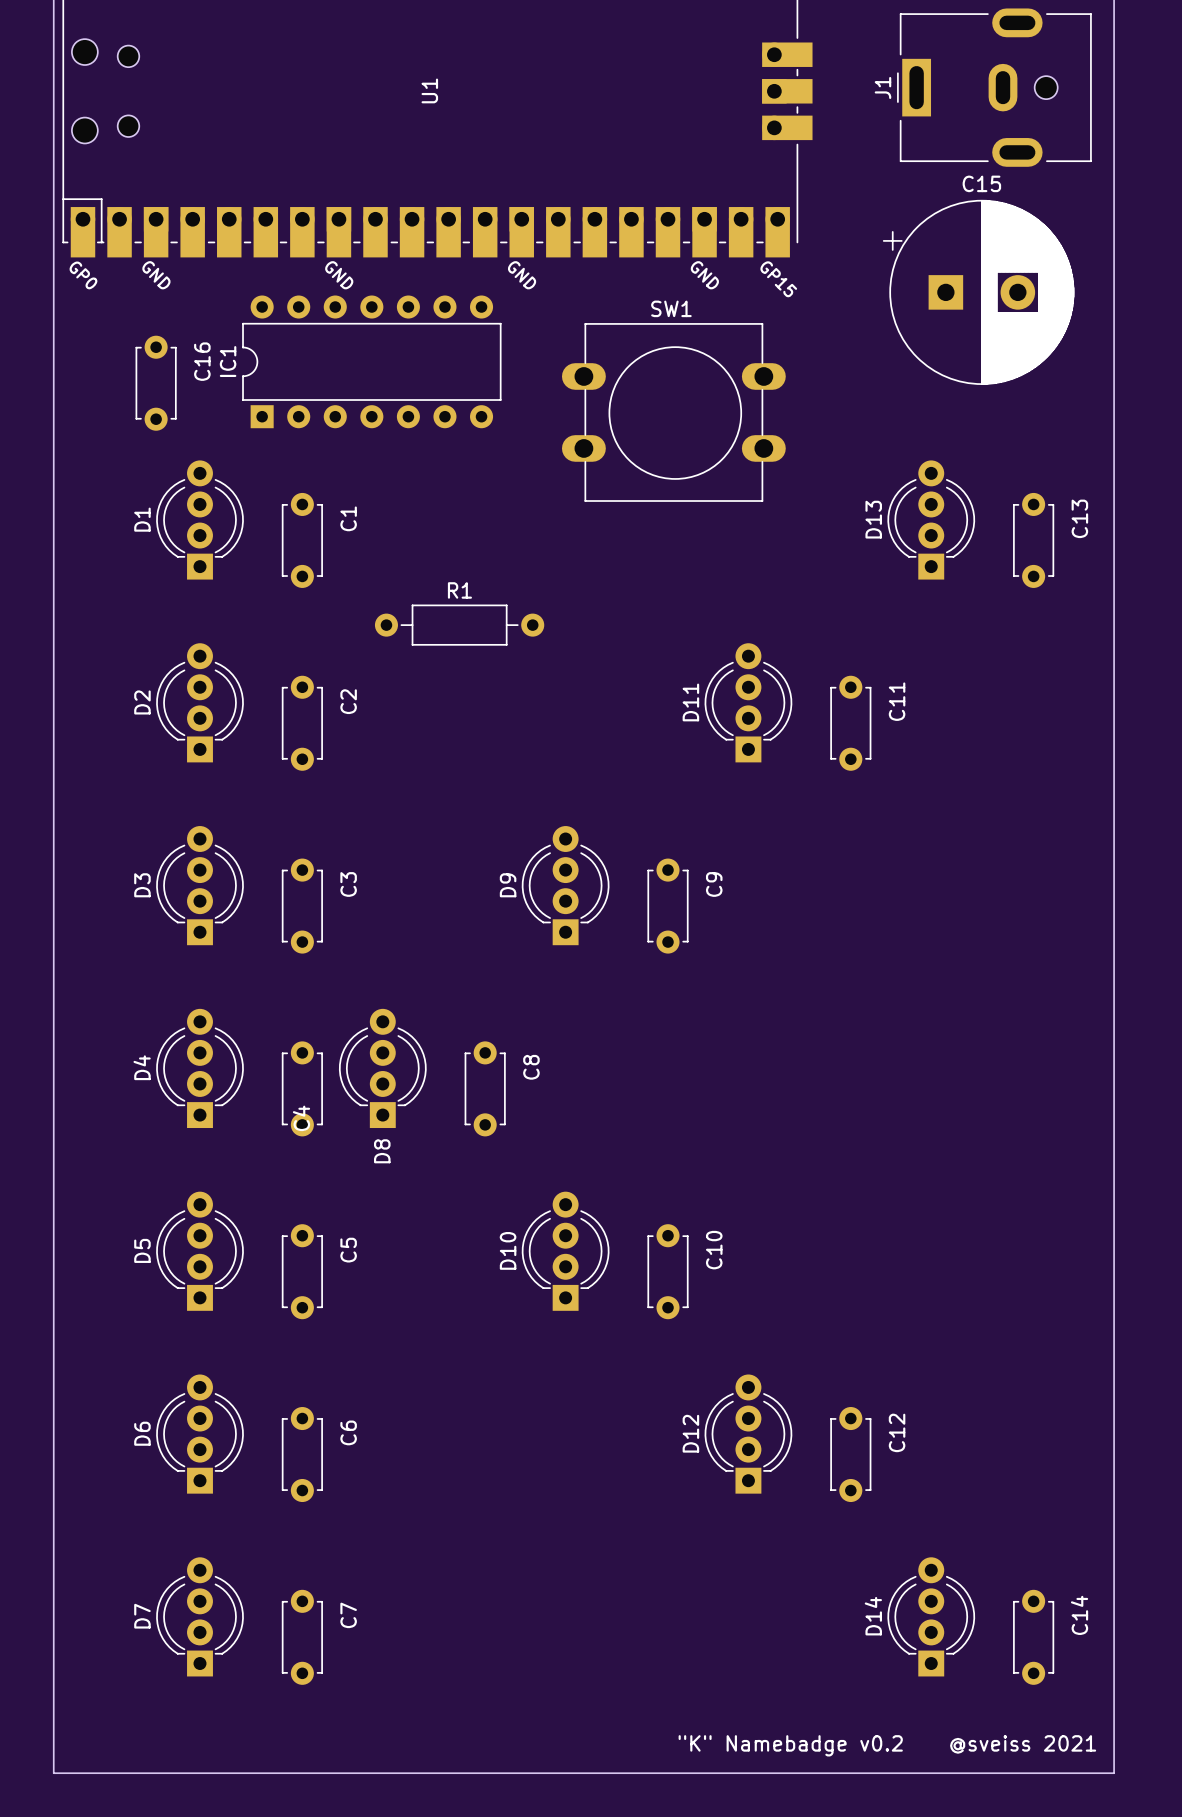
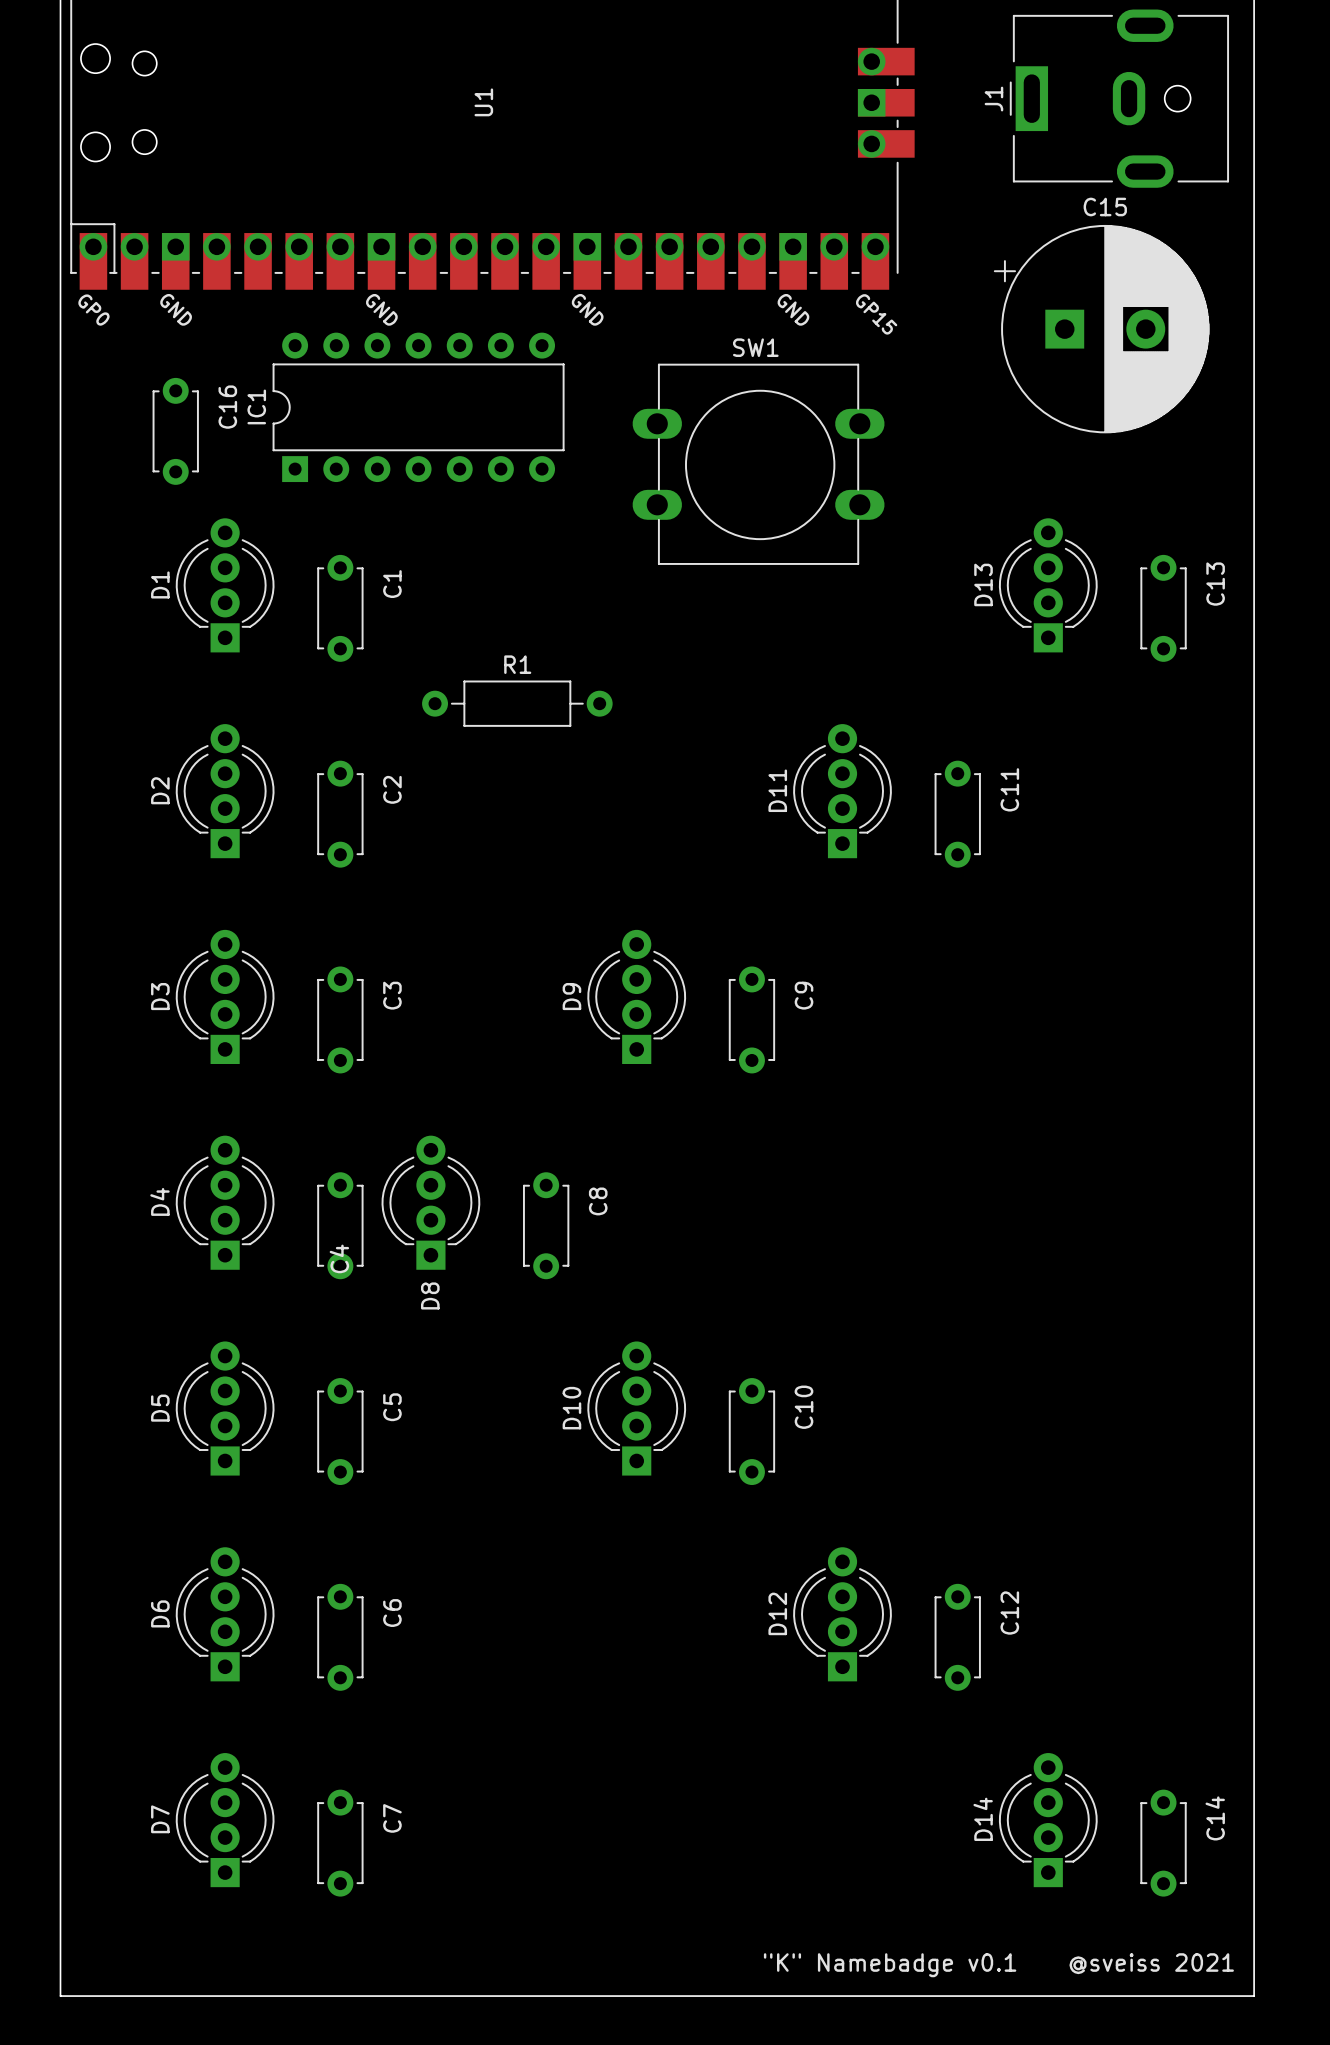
text: "K" Namebadge v0.2 @sveiss 2021 (887, 1745) -> "K" Namebadge v0.1 @sveiss 2021 (998, 1965)

